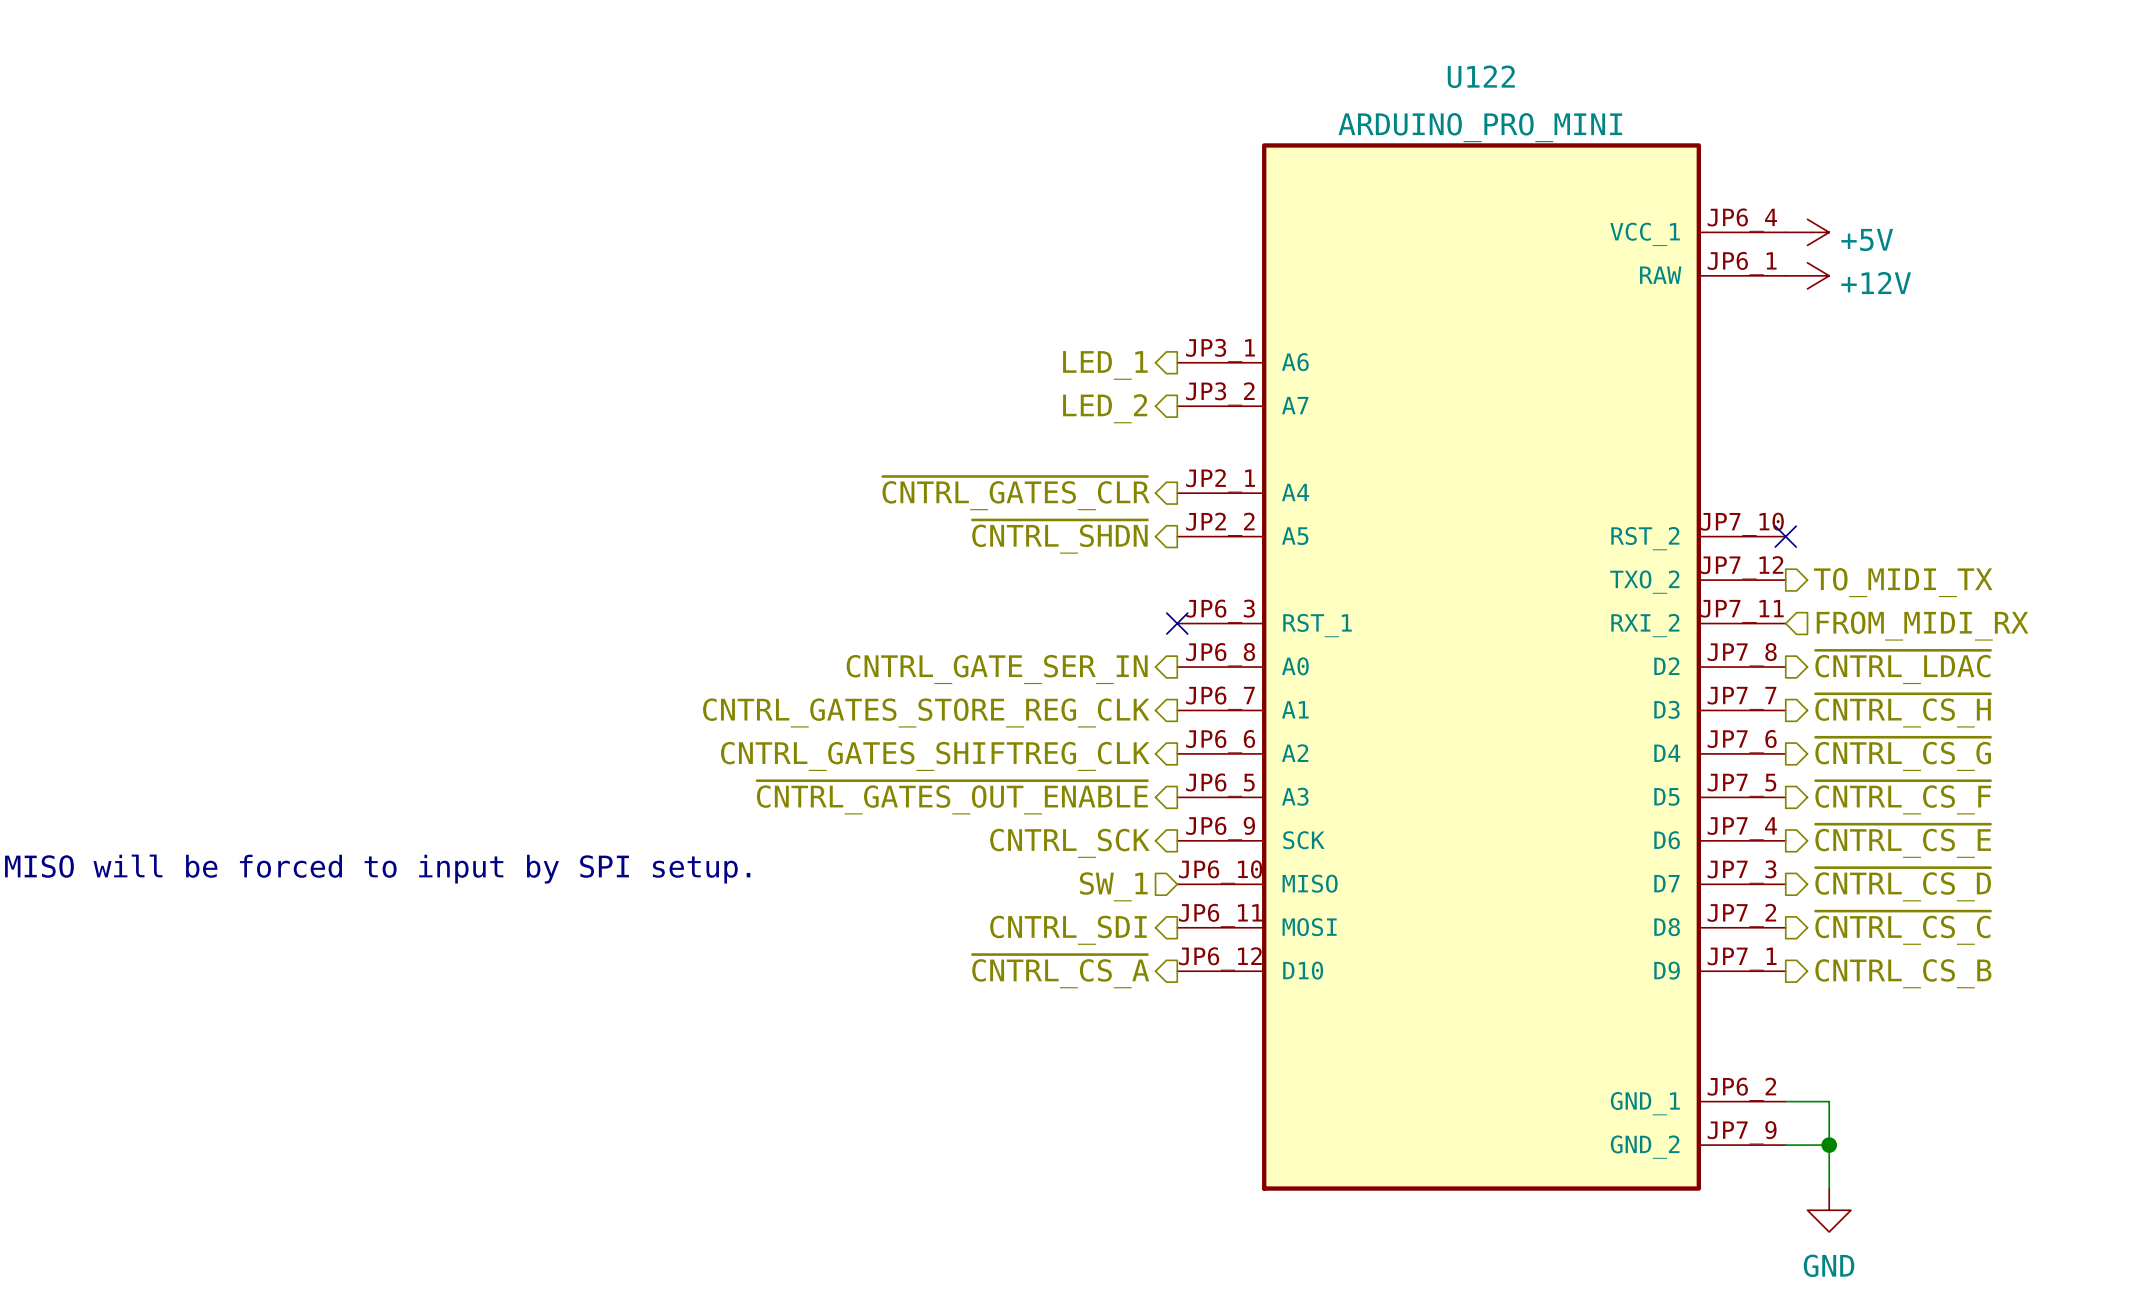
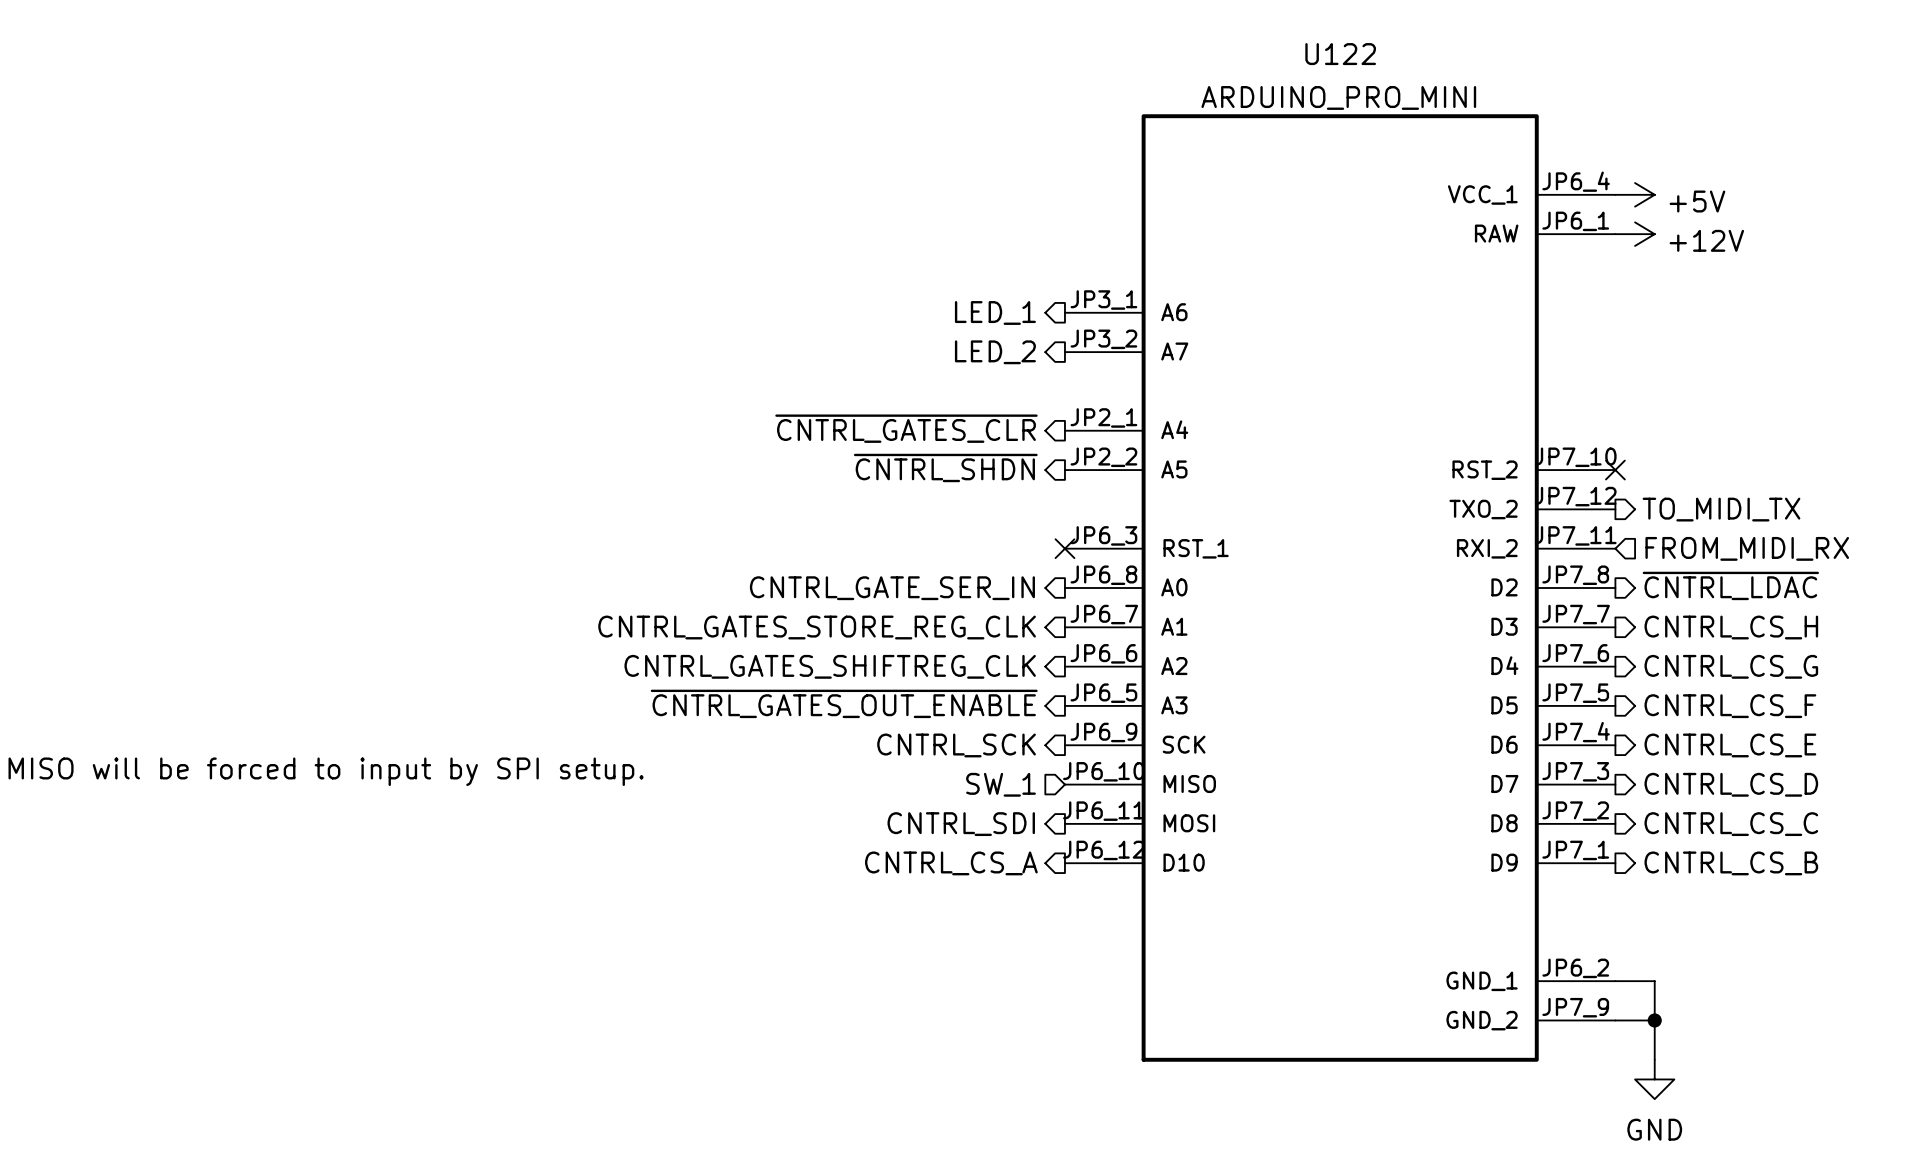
hierarchical label: ~{CNTRL_CS_H} (1903, 710) -> CNTRL_CS_H (1731, 627)
hierarchical label: ~{CNTRL_CS_G} (1903, 754) -> CNTRL_CS_G (1731, 666)
hierarchical label: ~{CNTRL_CS_F} (1903, 797) -> CNTRL_CS_F (1730, 706)
hierarchical label: ~{CNTRL_CS_E} (1903, 841) -> CNTRL_CS_E (1730, 745)
hierarchical label: ~{CNTRL_CS_D} (1903, 884) -> CNTRL_CS_D (1731, 784)
hierarchical label: ~{CNTRL_CS_C} (1902, 927) -> CNTRL_CS_C (1731, 824)
hierarchical label: ~{CNTRL_CS_A} (1060, 971) -> CNTRL_CS_A (951, 863)

